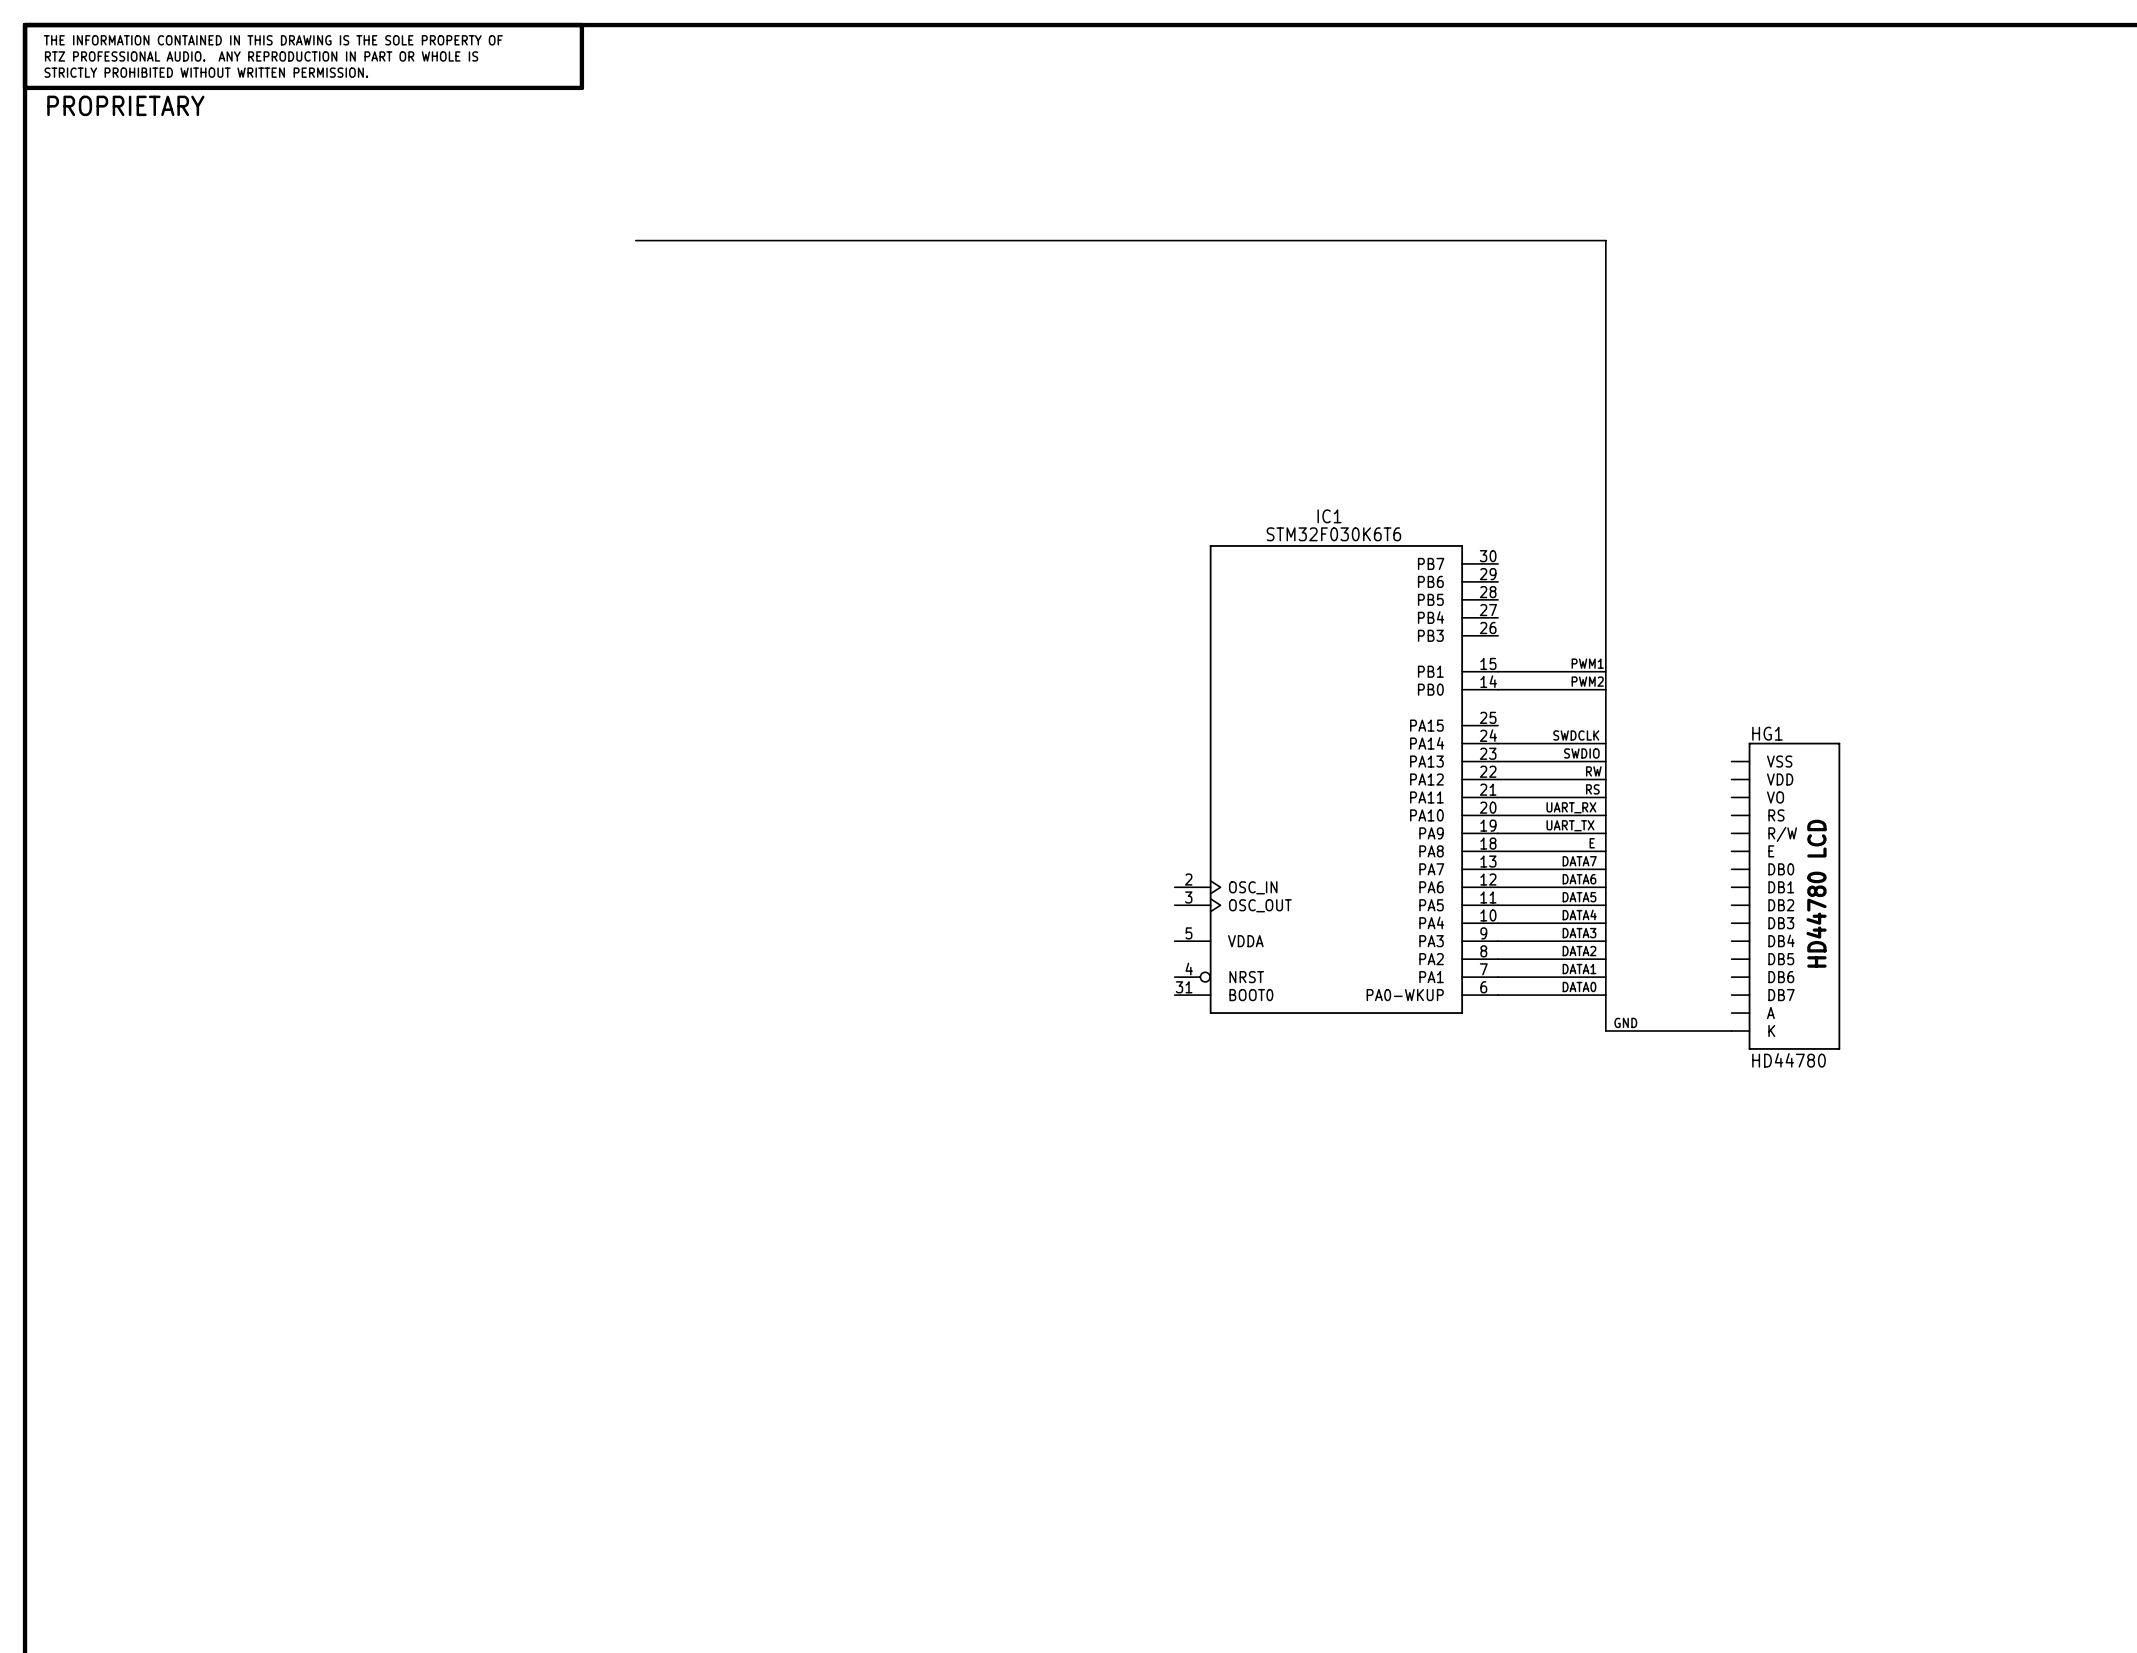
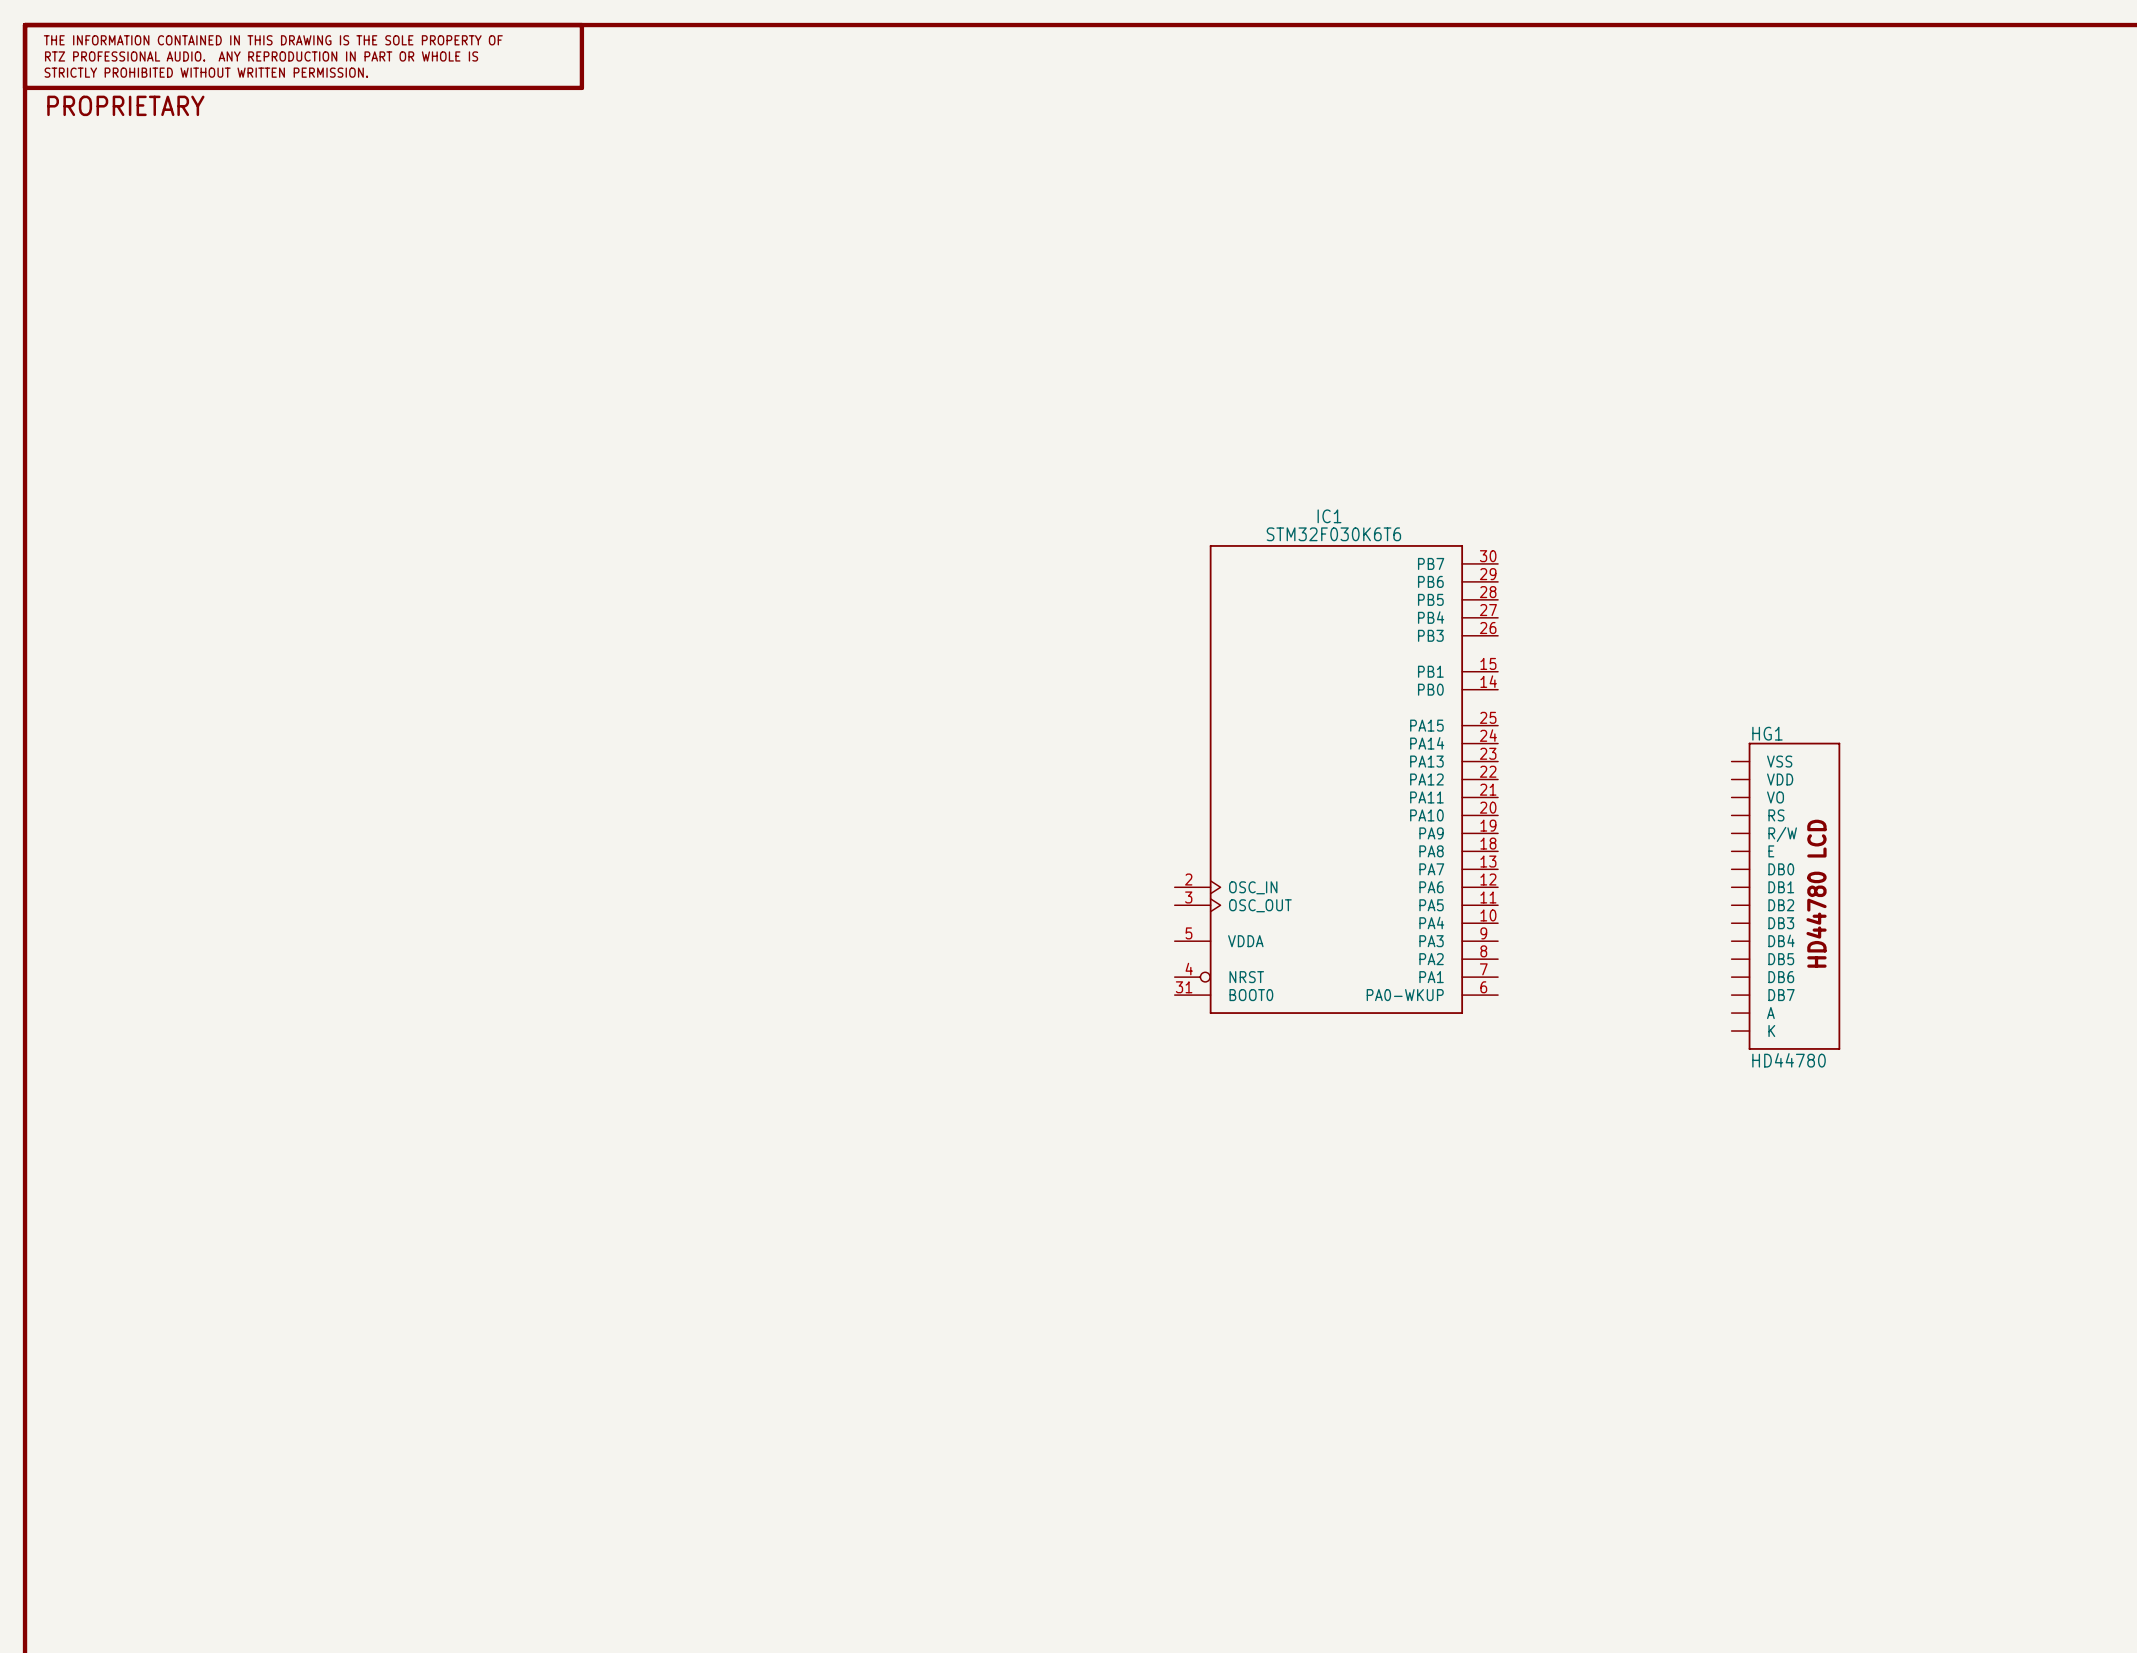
bus: (635, 240) (1605, 240) (1605, 1031) -> none
label: PWM1 (1587, 663) -> none
wire: (1498, 671) (1605, 671) -> none
label: PWM2 (1587, 681) -> none
wire: (1498, 689) (1605, 689) -> none
label: SWDCLK (1576, 735) -> none
wire: (1498, 743) (1605, 743) -> none
label: SWDIO (1581, 753) -> none
wire: (1498, 761) (1605, 761) -> none
label: RW (1593, 771) -> none
wire: (1498, 779) (1605, 779) -> none
label: RS (1592, 789) -> none
wire: (1498, 797) (1605, 797) -> none
label: UART_RX (1571, 807) -> none
wire: (1498, 815) (1605, 815) -> none
label: UART_TX (1570, 825) -> none
wire: (1498, 833) (1605, 833) -> none
label: E (1592, 843) -> none
wire: (1498, 851) (1605, 851) -> none
label: DATA7 (1579, 861) -> none
wire: (1498, 869) (1605, 869) -> none
label: DATA6 (1579, 879) -> none
wire: (1498, 887) (1605, 887) -> none
label: DATA5 (1579, 897) -> none
wire: (1498, 905) (1605, 905) -> none
label: DATA4 (1579, 914) -> none
wire: (1498, 923) (1605, 923) -> none
label: DATA3 (1579, 933) -> none
wire: (1498, 941) (1605, 941) -> none
label: DATA2 (1579, 951) -> none
wire: (1498, 959) (1605, 959) -> none
label: DATA1 (1579, 969) -> none
wire: (1498, 977) (1605, 977) -> none
label: DATA0 (1579, 986) -> none
wire: (1498, 995) (1605, 995) -> none
label: GND (1625, 1022) -> none
wire: (1605, 1031) (1731, 1031) -> none

